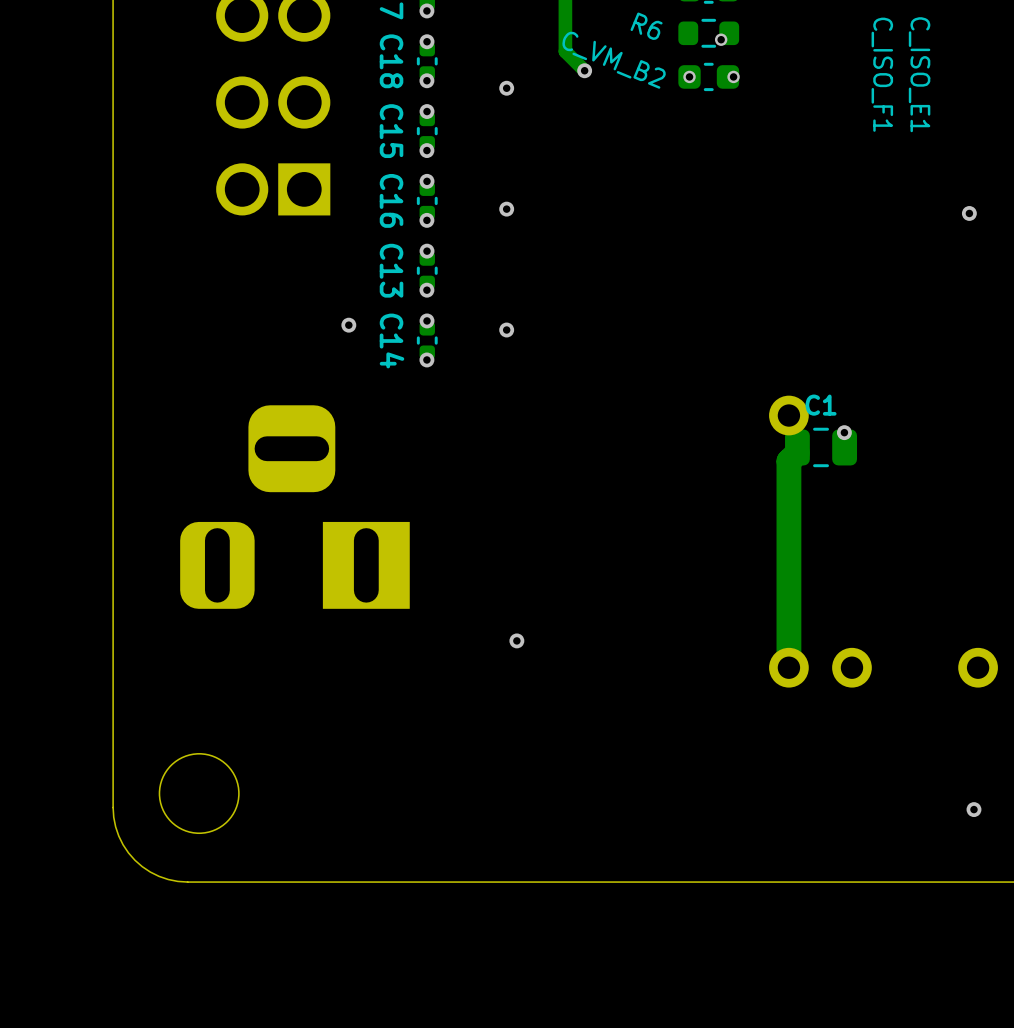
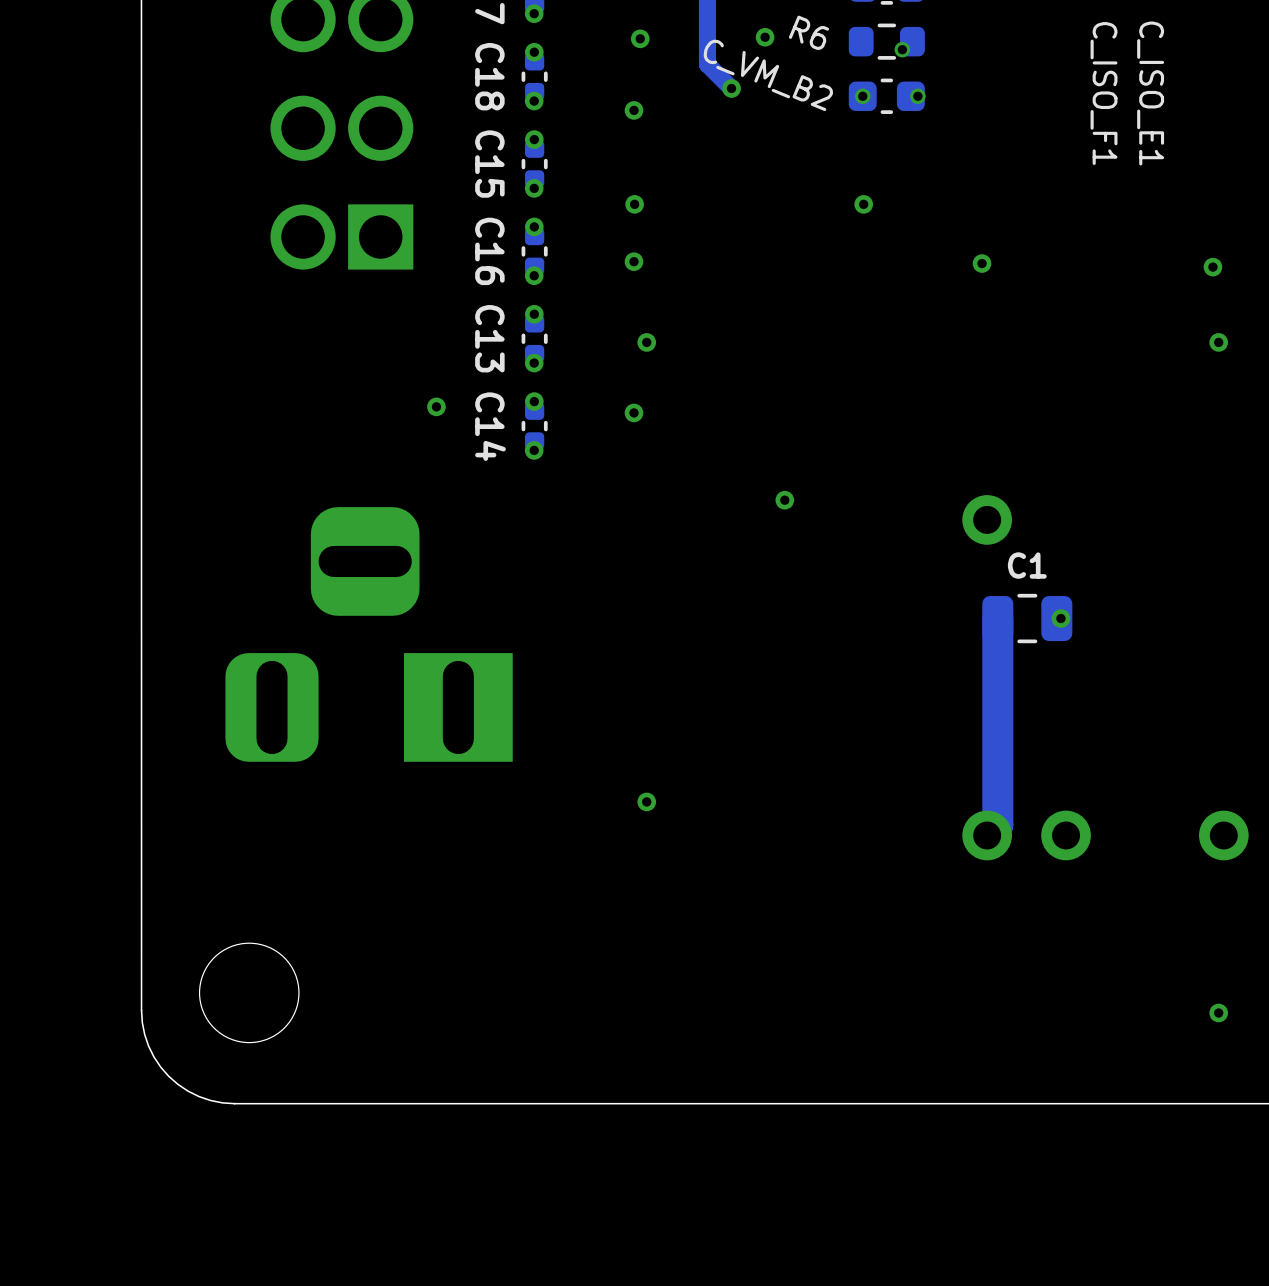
via: none -> (765, 37)
via: none -> (640, 38)
via: none -> (634, 204)
via: none -> (863, 204)
via: none -> (982, 263)
via: none -> (646, 342)
via: none -> (1218, 342)
via: none -> (784, 500)
via position: (844, 432) -> (1060, 618)
C1 position: (821, 447) -> (1027, 618)
track: (797, 452) (788, 461) (788, 667) -> (997, 618) (997, 824) (987, 835)

